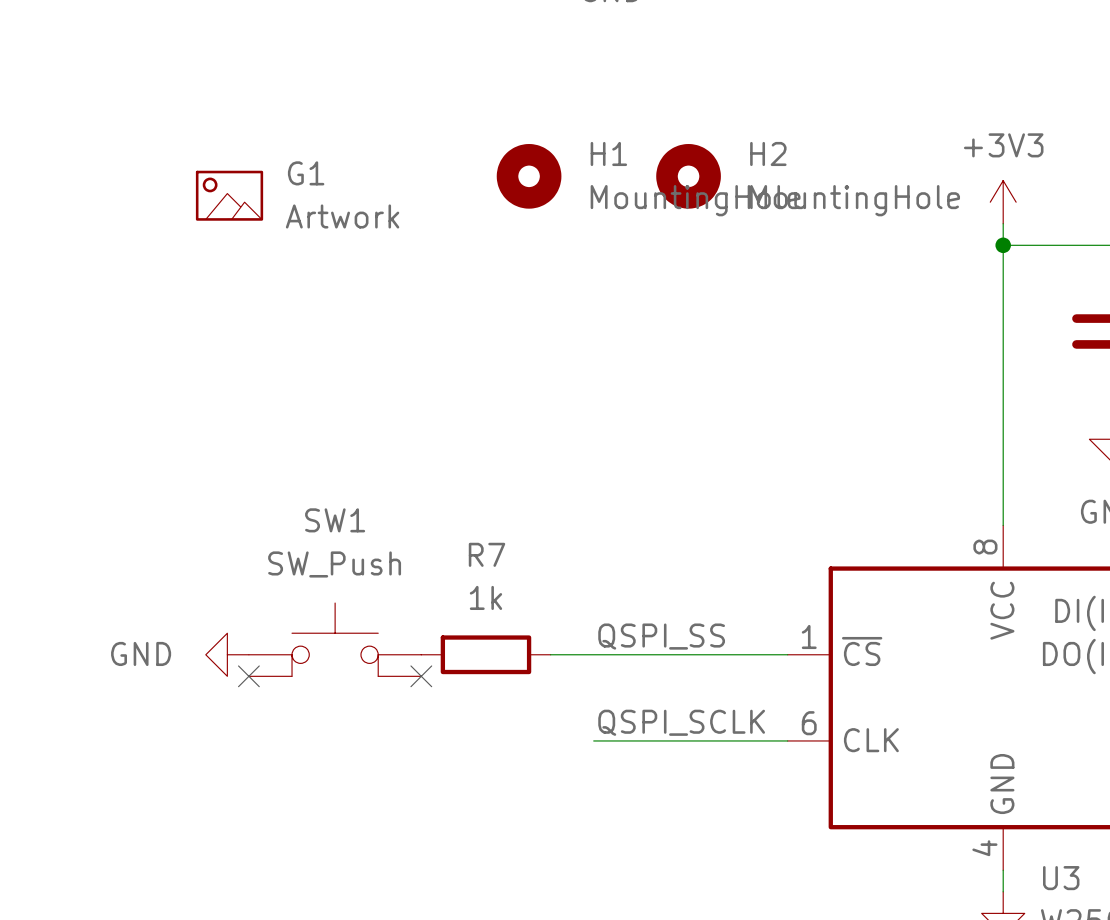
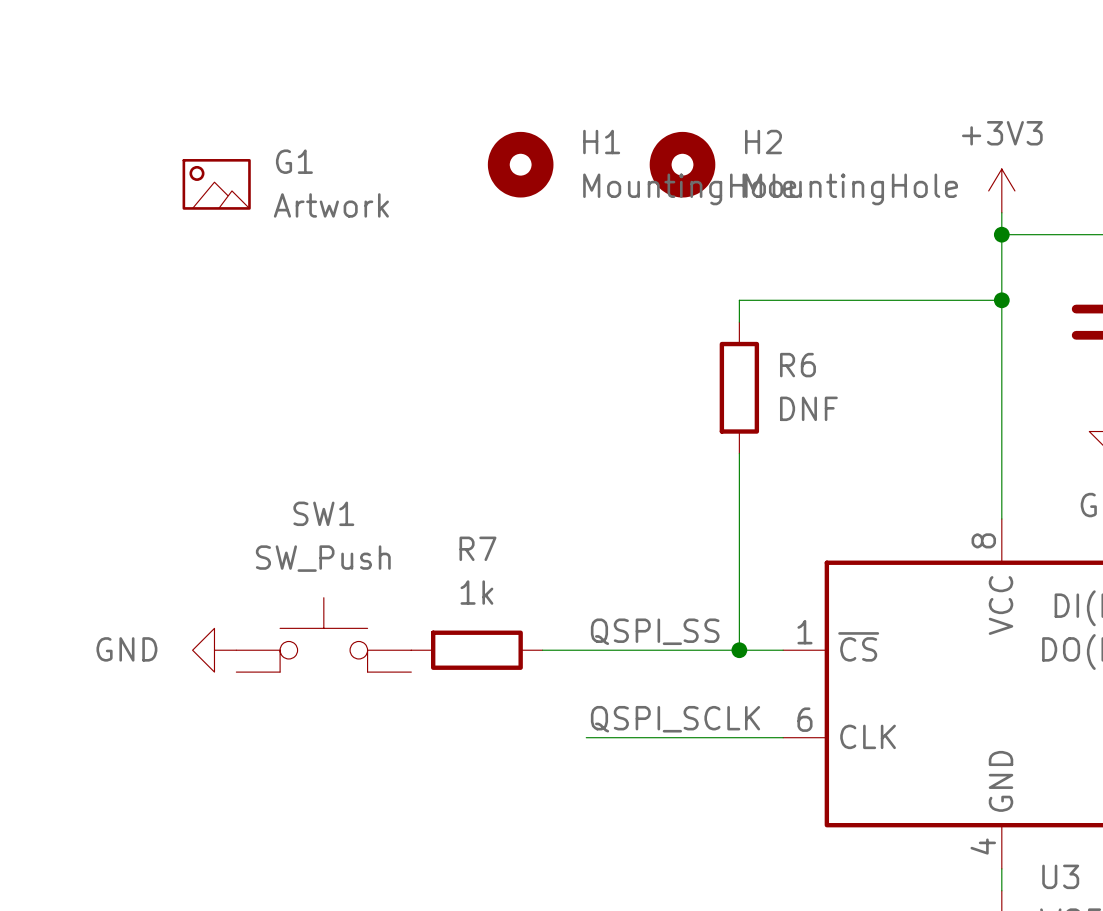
wire: none -> (1001, 300) (739, 300) (739, 322)
junction: none -> (1001, 300)
R6: none -> DNF (739, 387)
wire: none -> (739, 453) (739, 650)
junction: none -> (739, 650)
no-connect mark: (248, 676) -> none
no-connect mark: (421, 676) -> none

